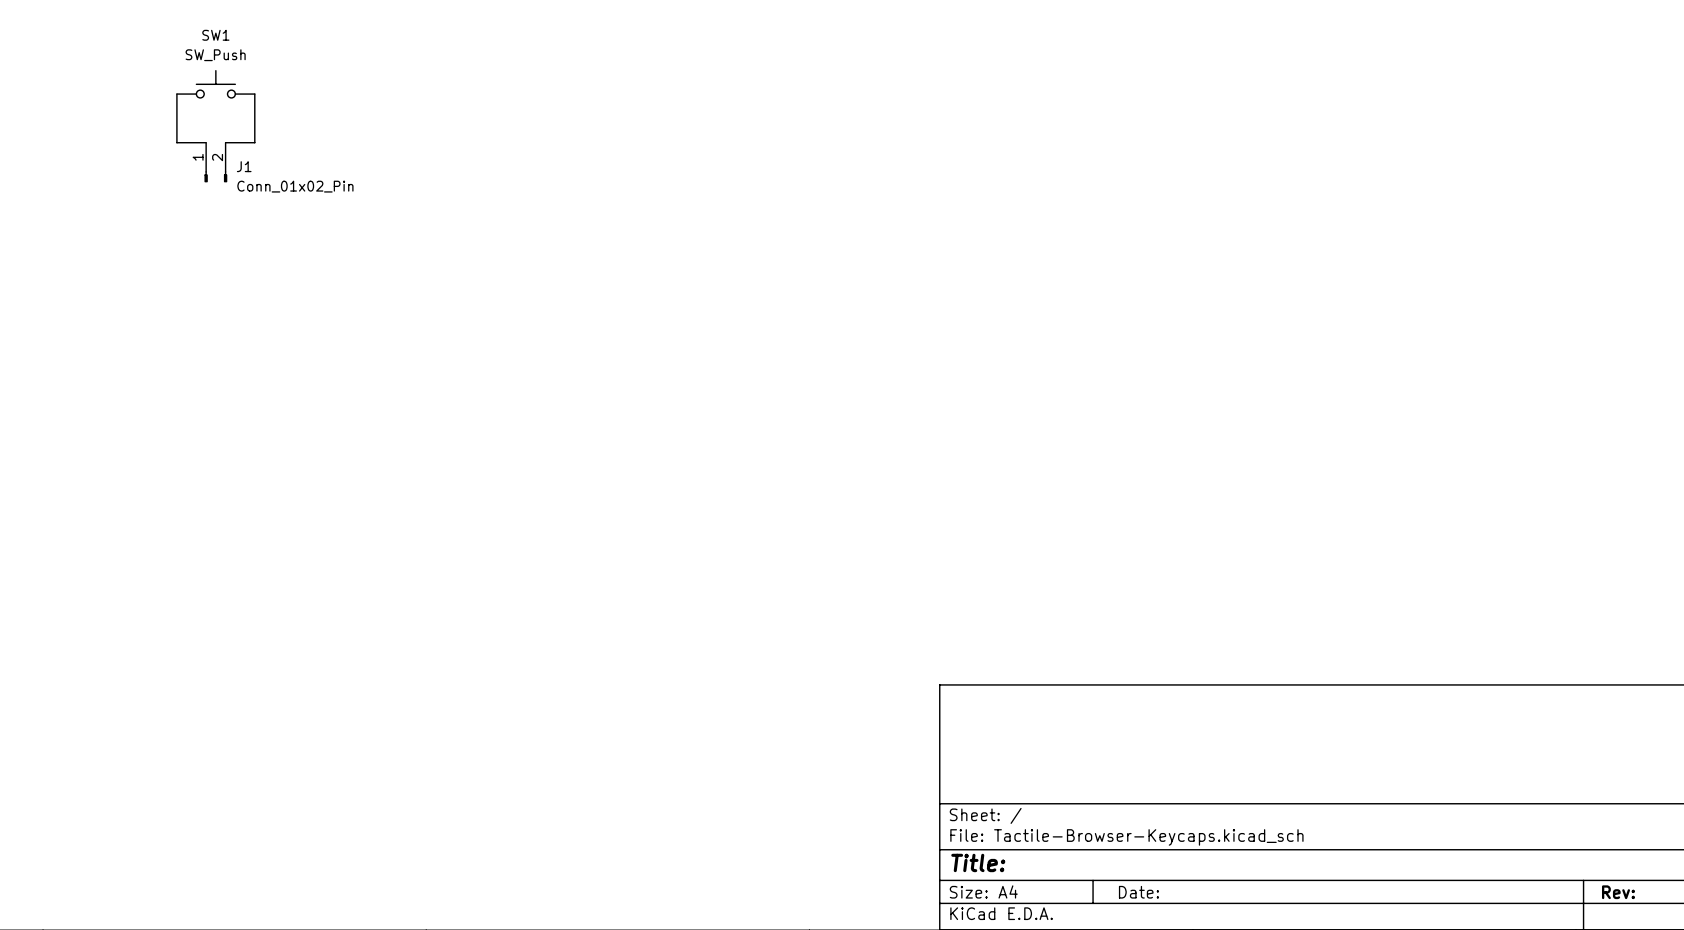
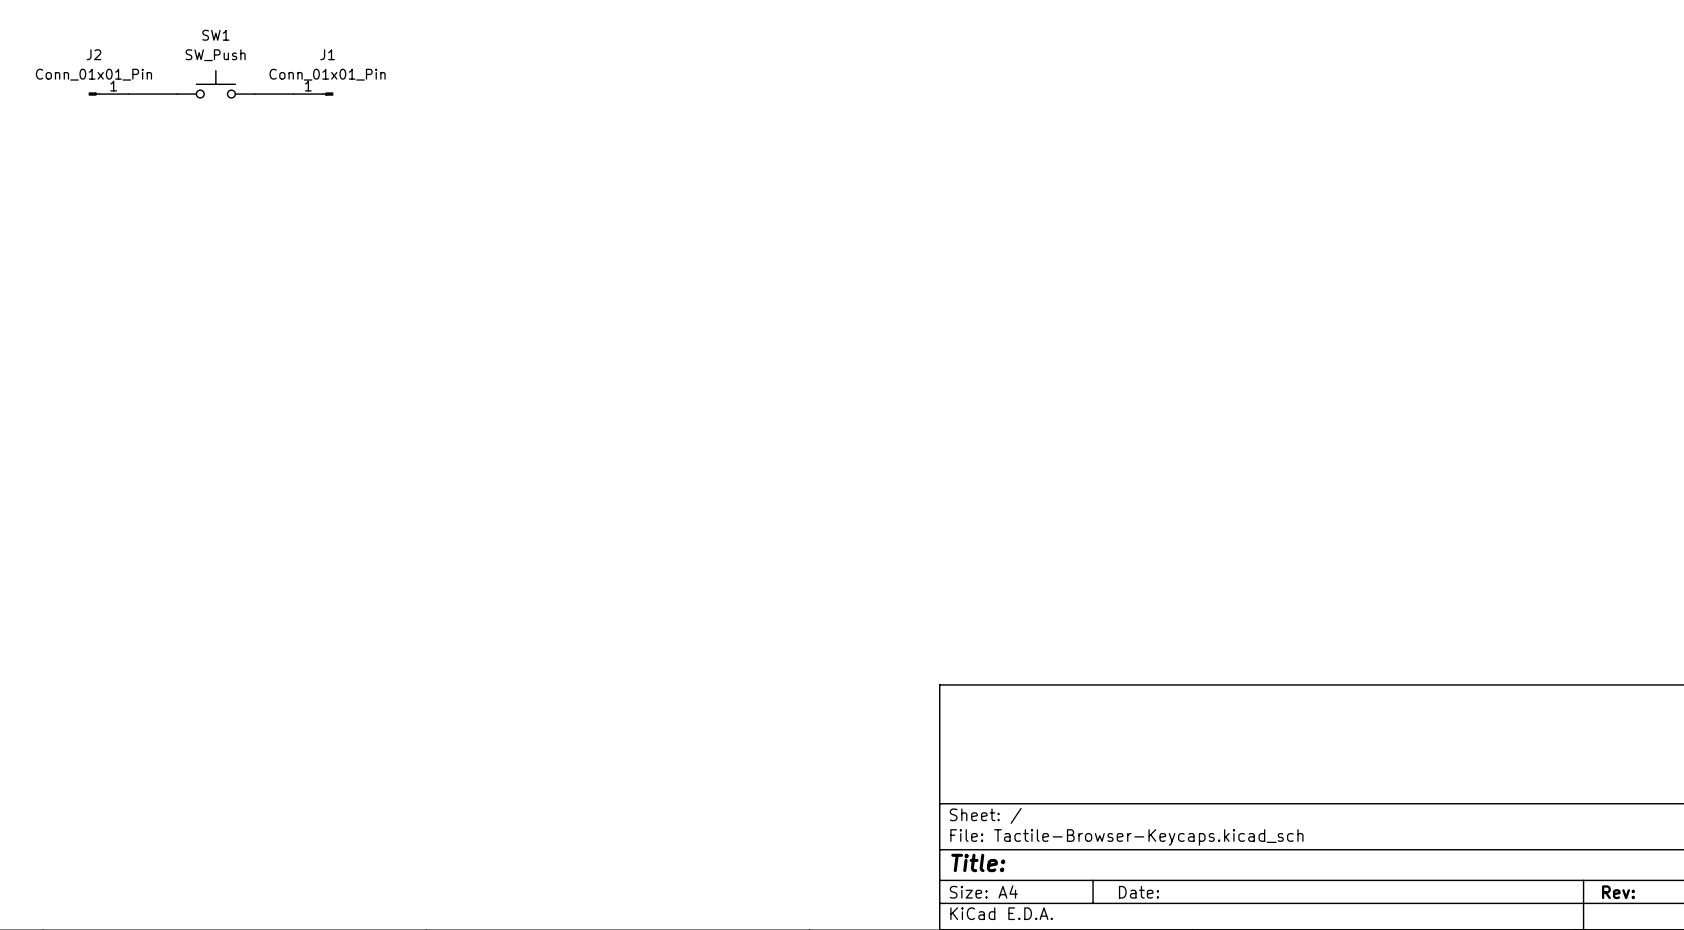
J2: none -> Conn_01x01_Pin (108, 94)
wire: (176, 94) (176, 142) (206, 142) -> (176, 94) (128, 94)
wire: (254, 94) (254, 142) (225, 142) -> (254, 94) (293, 94)
J1 symbol: [204, 142, 228, 183] -> [293, 92, 334, 96]
J1 name position: J1 (244, 166) -> J1 (327, 54)
J1 value: Conn_01x02_Pin (295, 186) -> Conn_01x01_Pin (327, 74)

